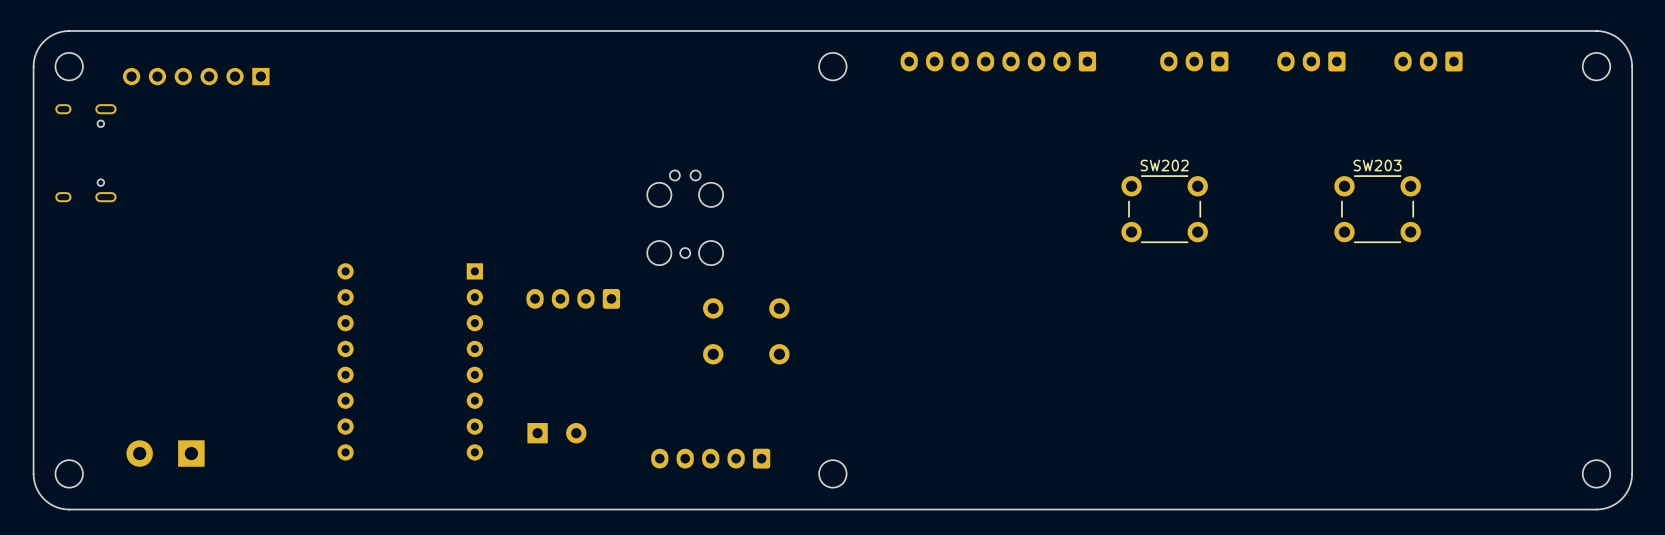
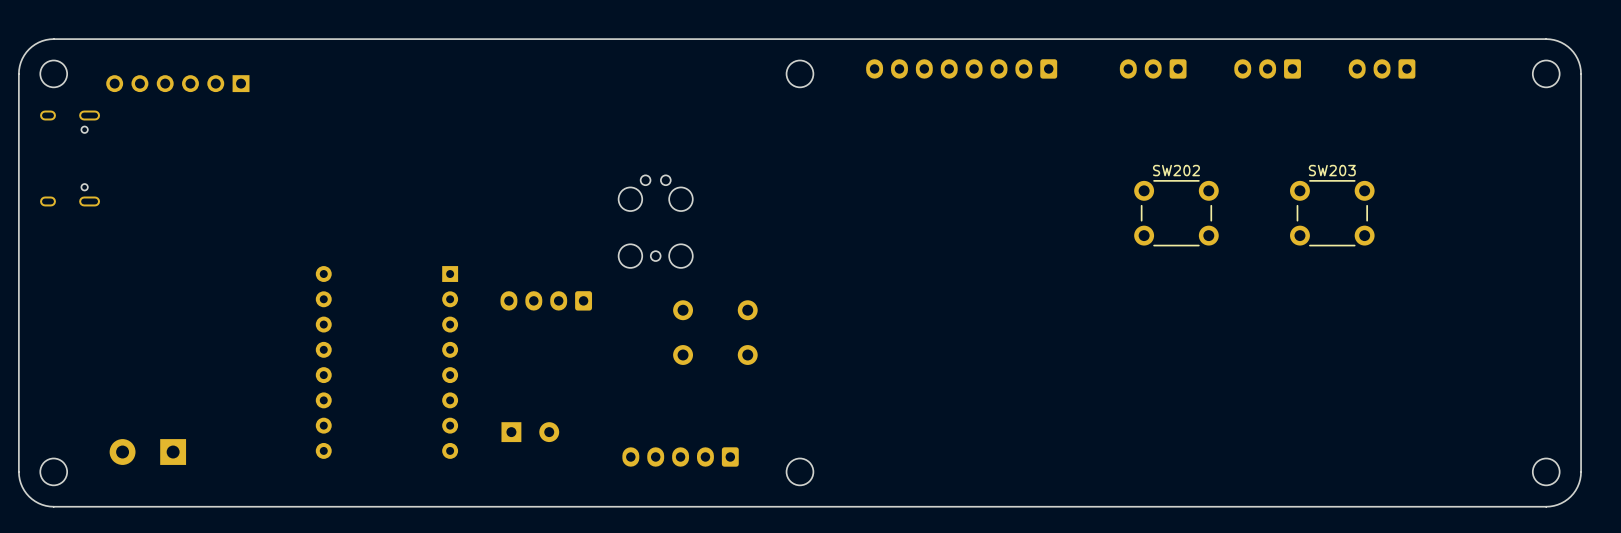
SW202 position: (1164, 209) -> (1176, 213)

